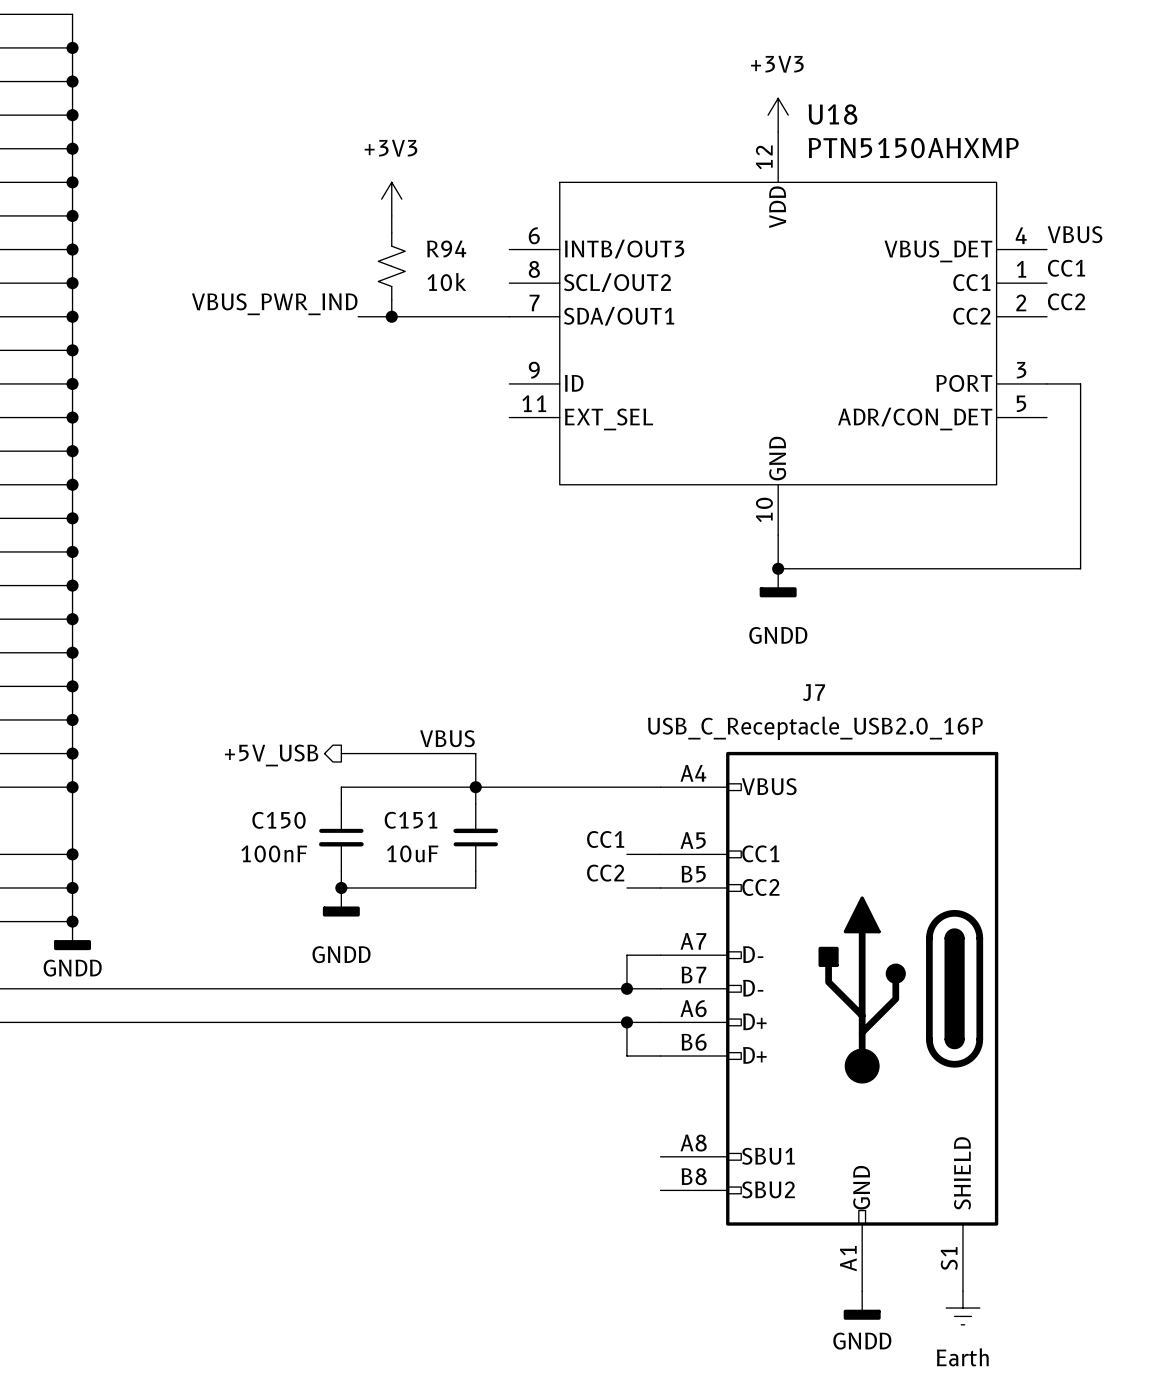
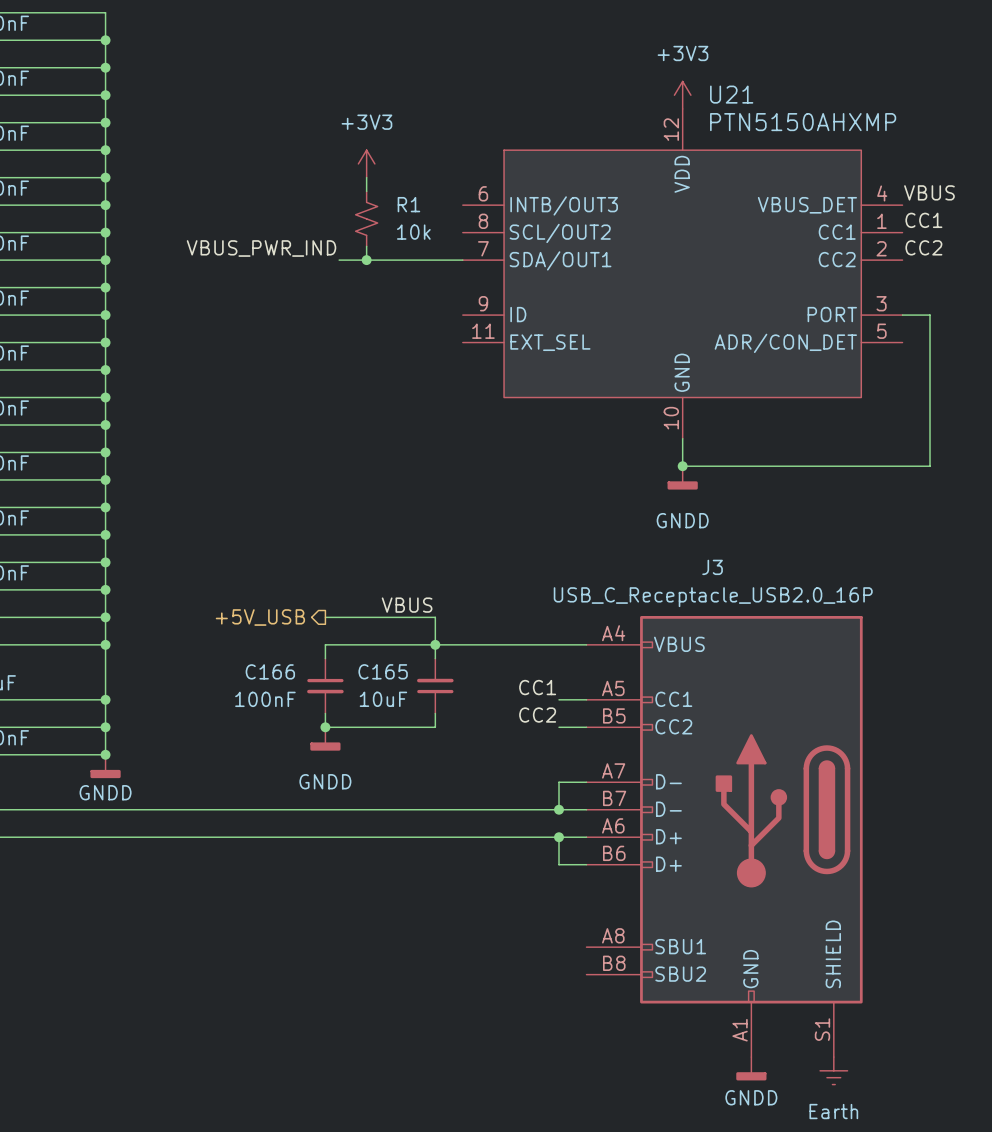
U18 name: U18 (832, 114) -> U21 (731, 94)
R94 name: R94 (446, 249) -> R1 (408, 204)
J7 name: J7 (814, 692) -> J3 (712, 567)
C150 name: C150 (279, 820) -> C166 (270, 671)
C151 name: C151 (411, 820) -> C165 (383, 671)

